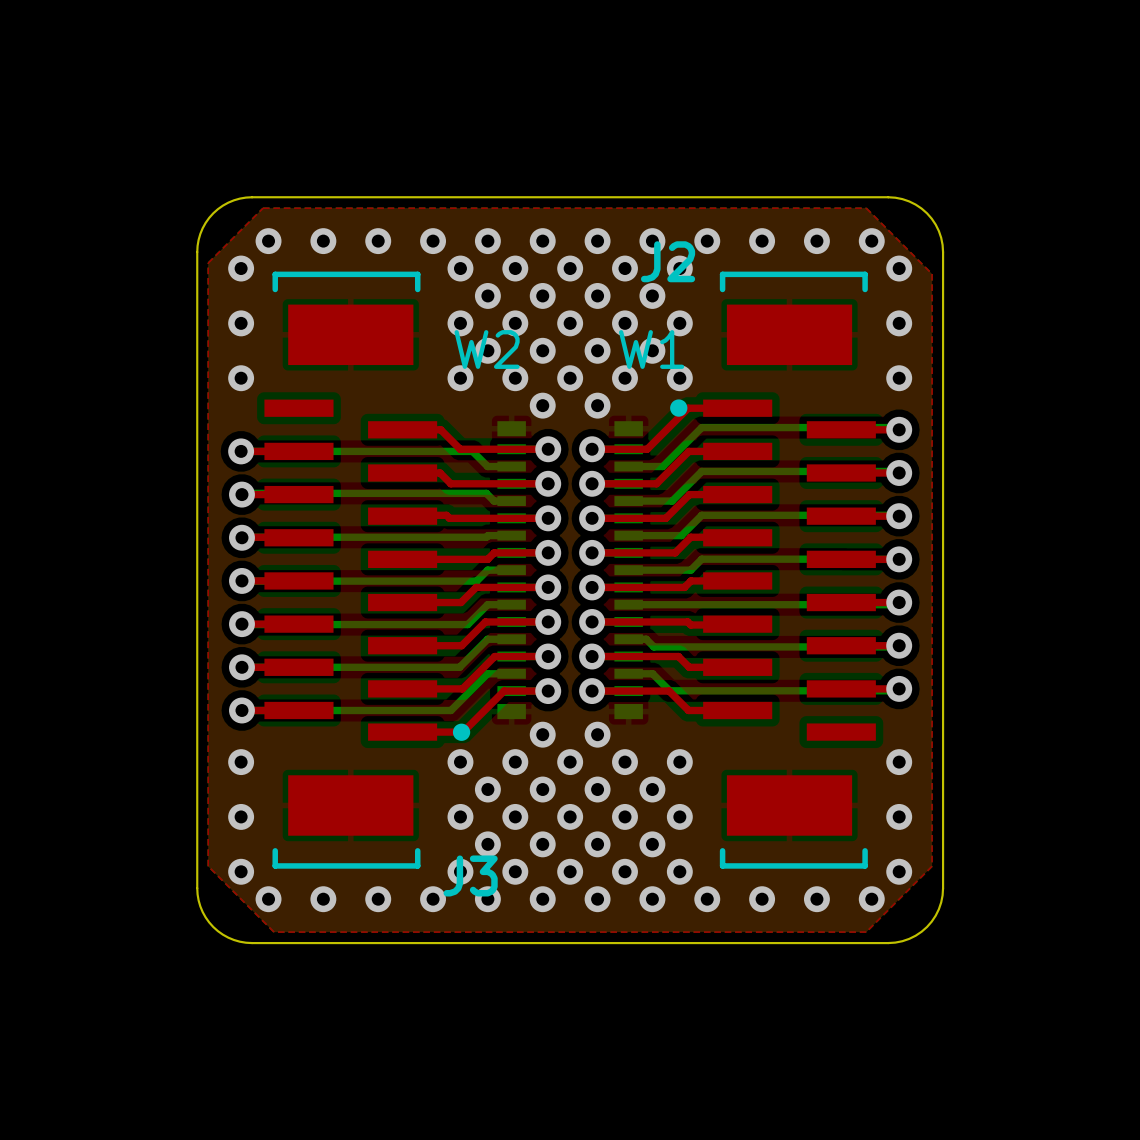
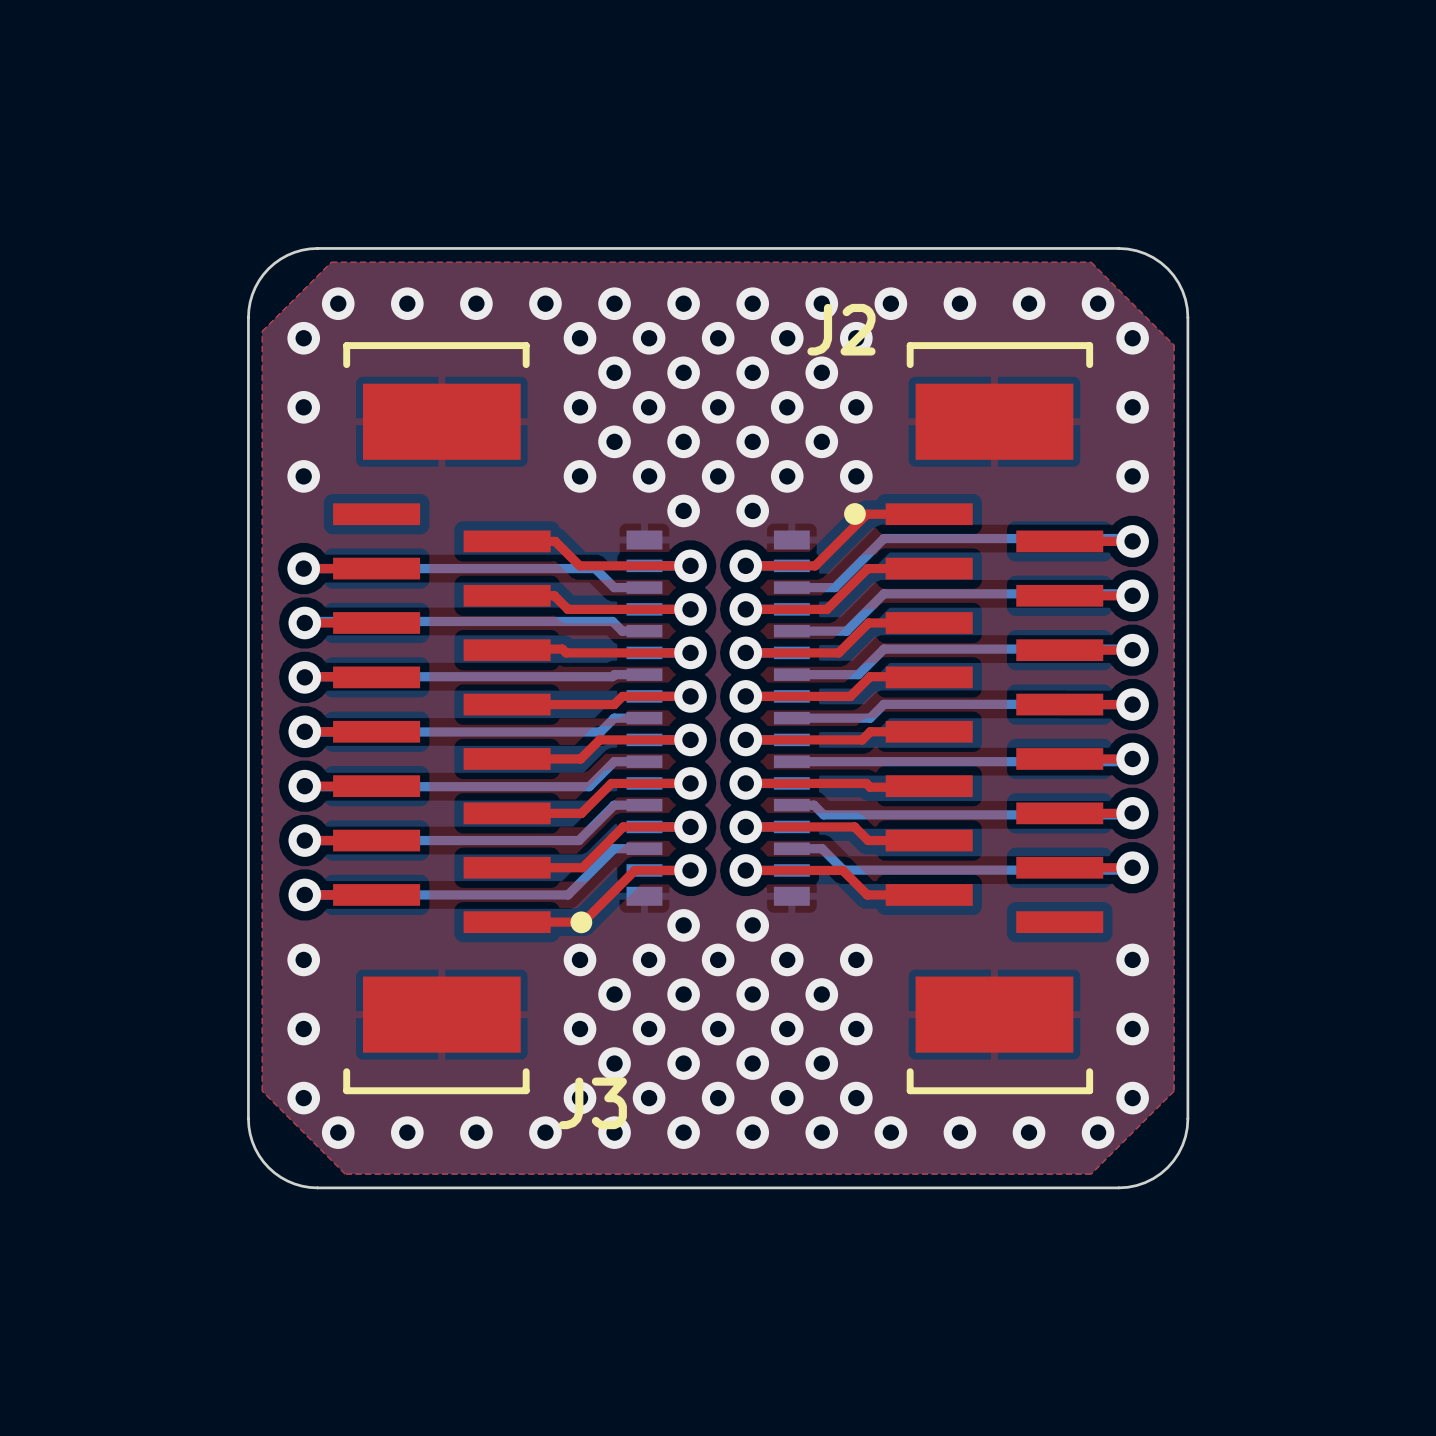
text: W2 (487, 349) -> none
text: W1 (651, 349) -> none

